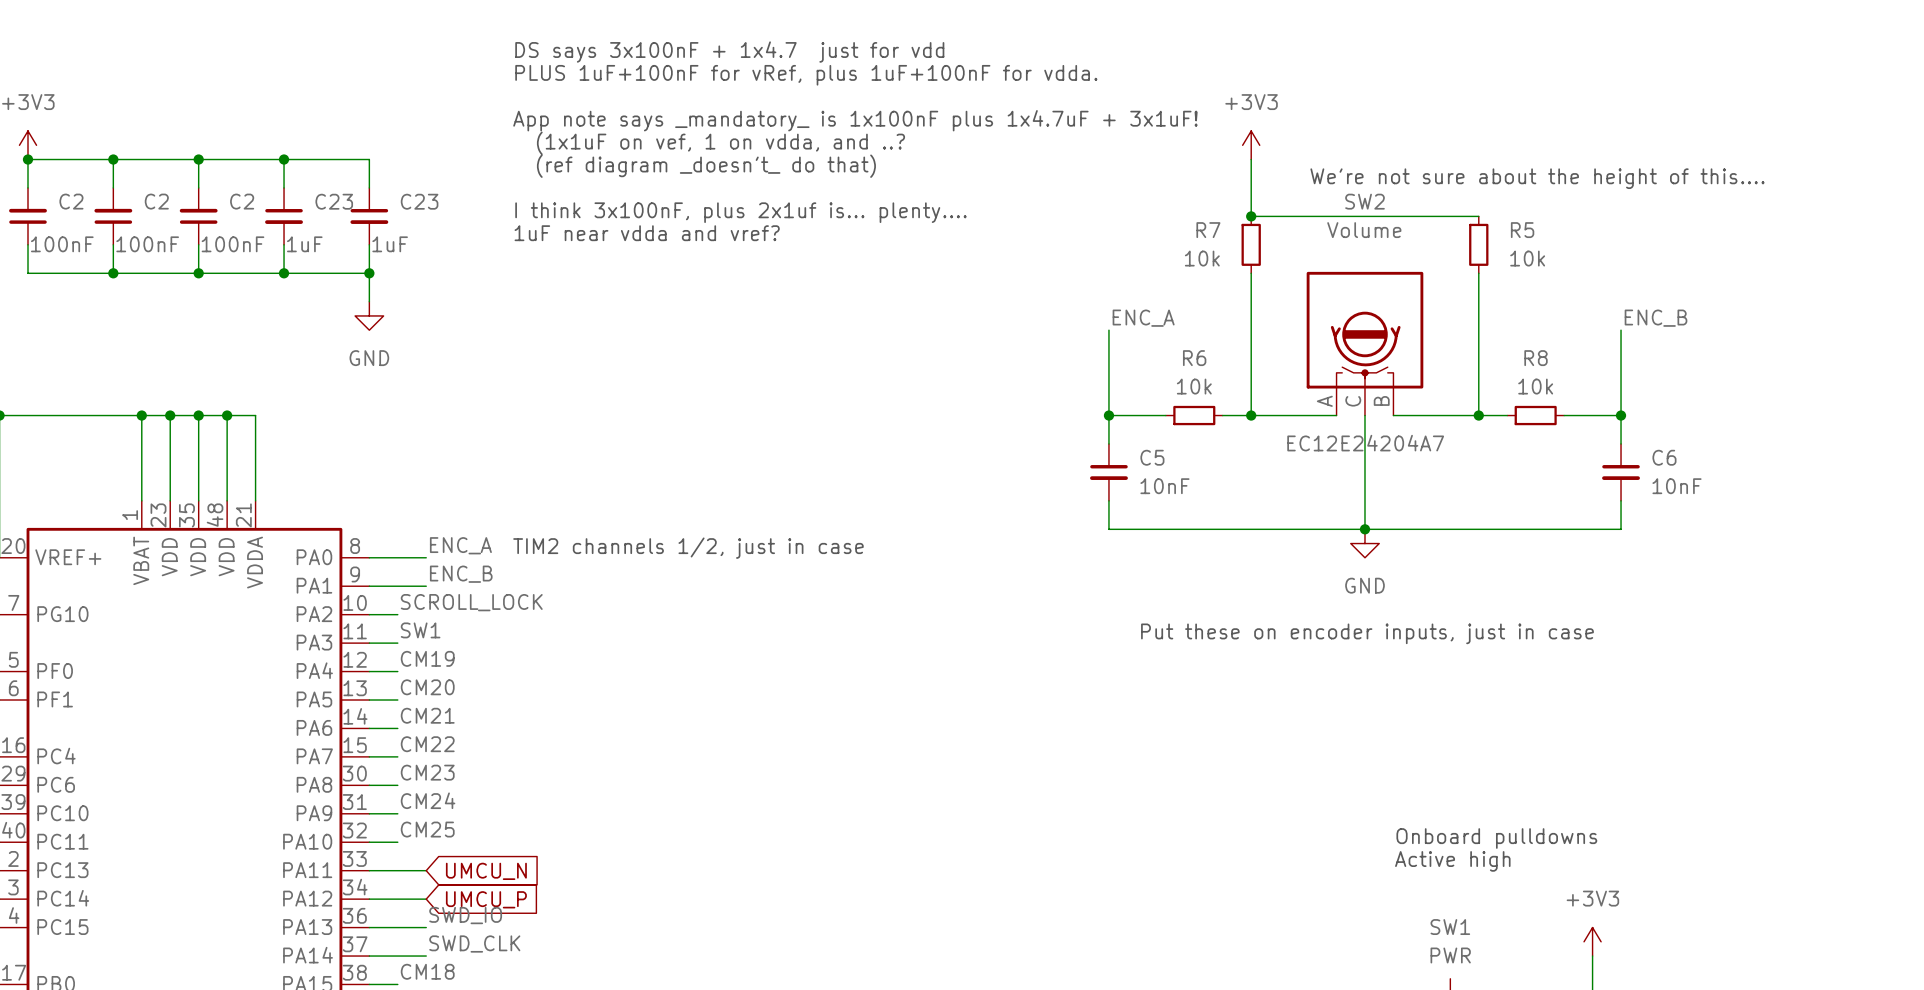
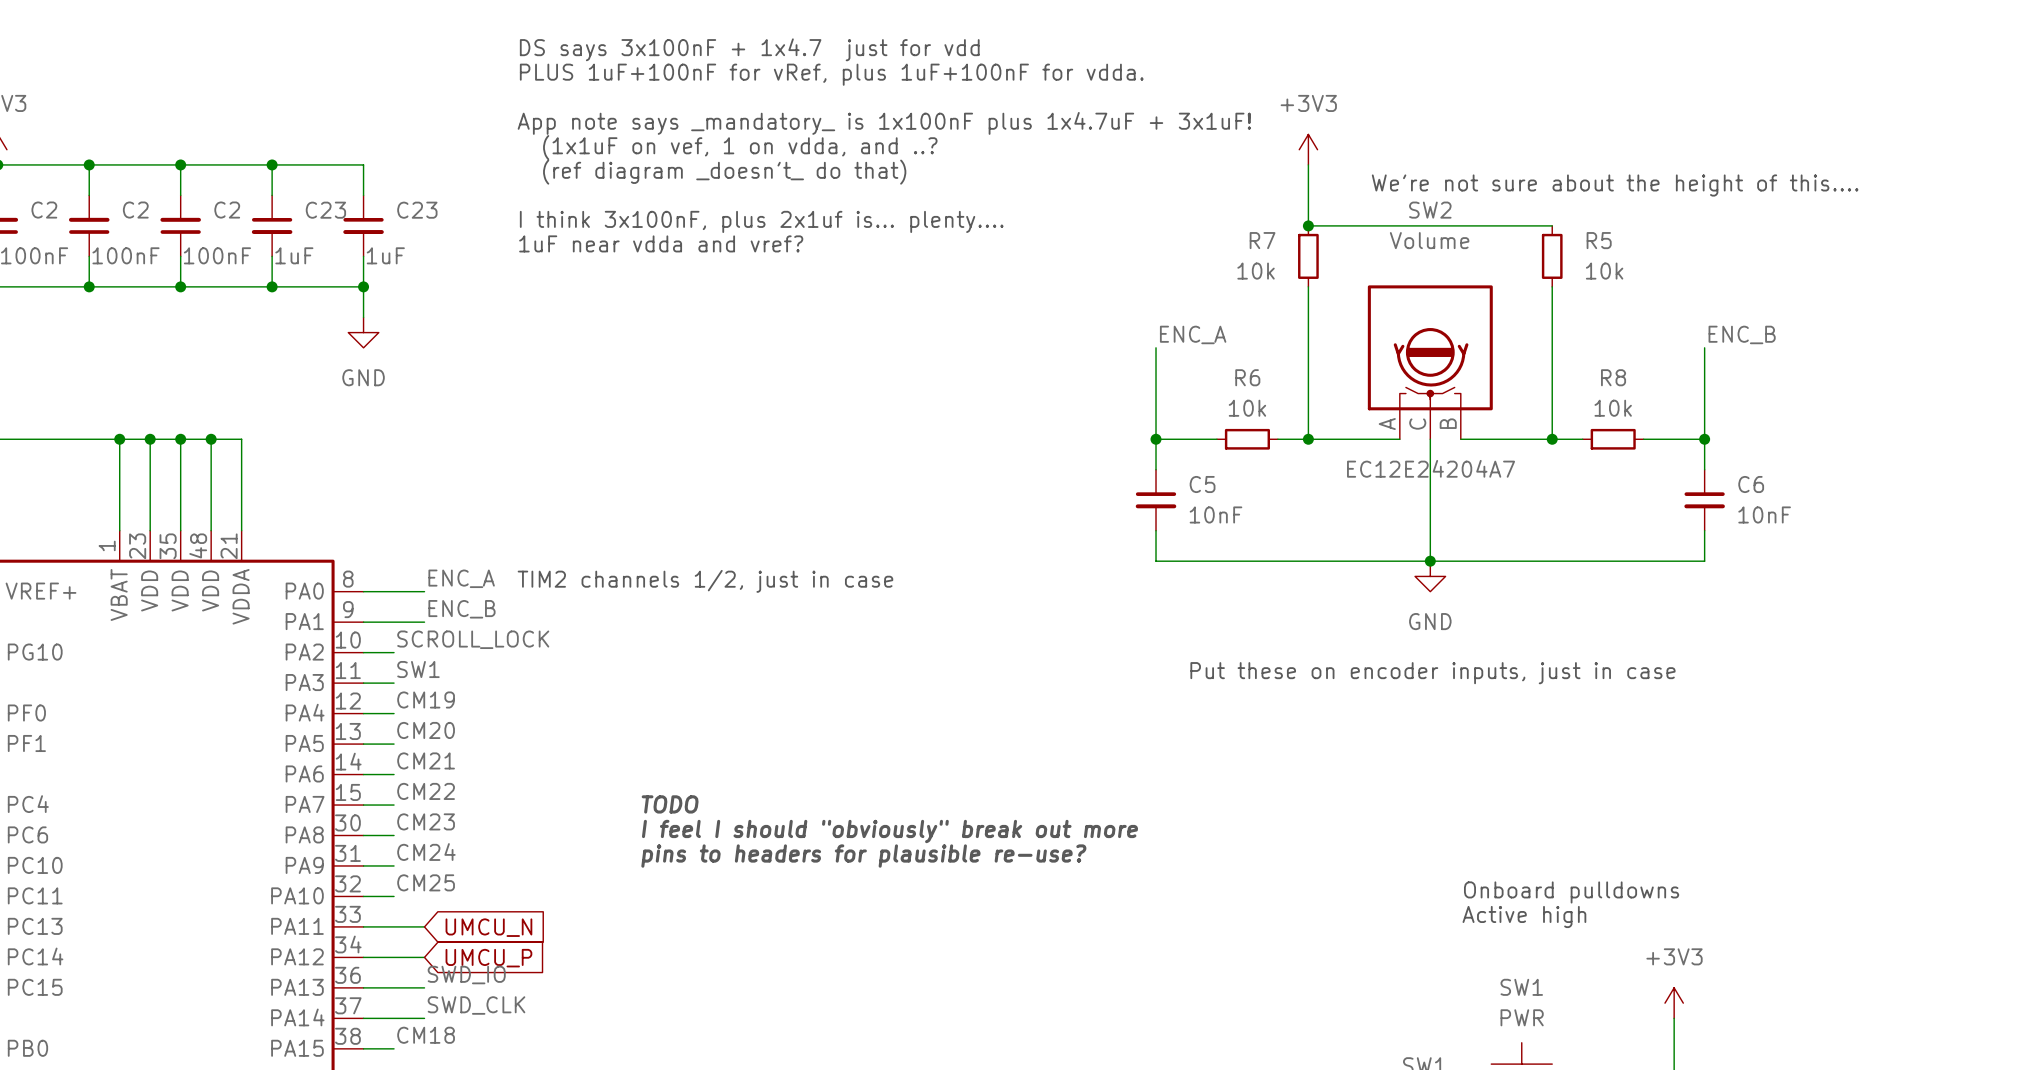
text: none -> TODO (670, 804)
text: none -> I feel I should "obviously" break out more (890, 831)
text: none -> pins to headers for plausible re-use? (863, 856)

